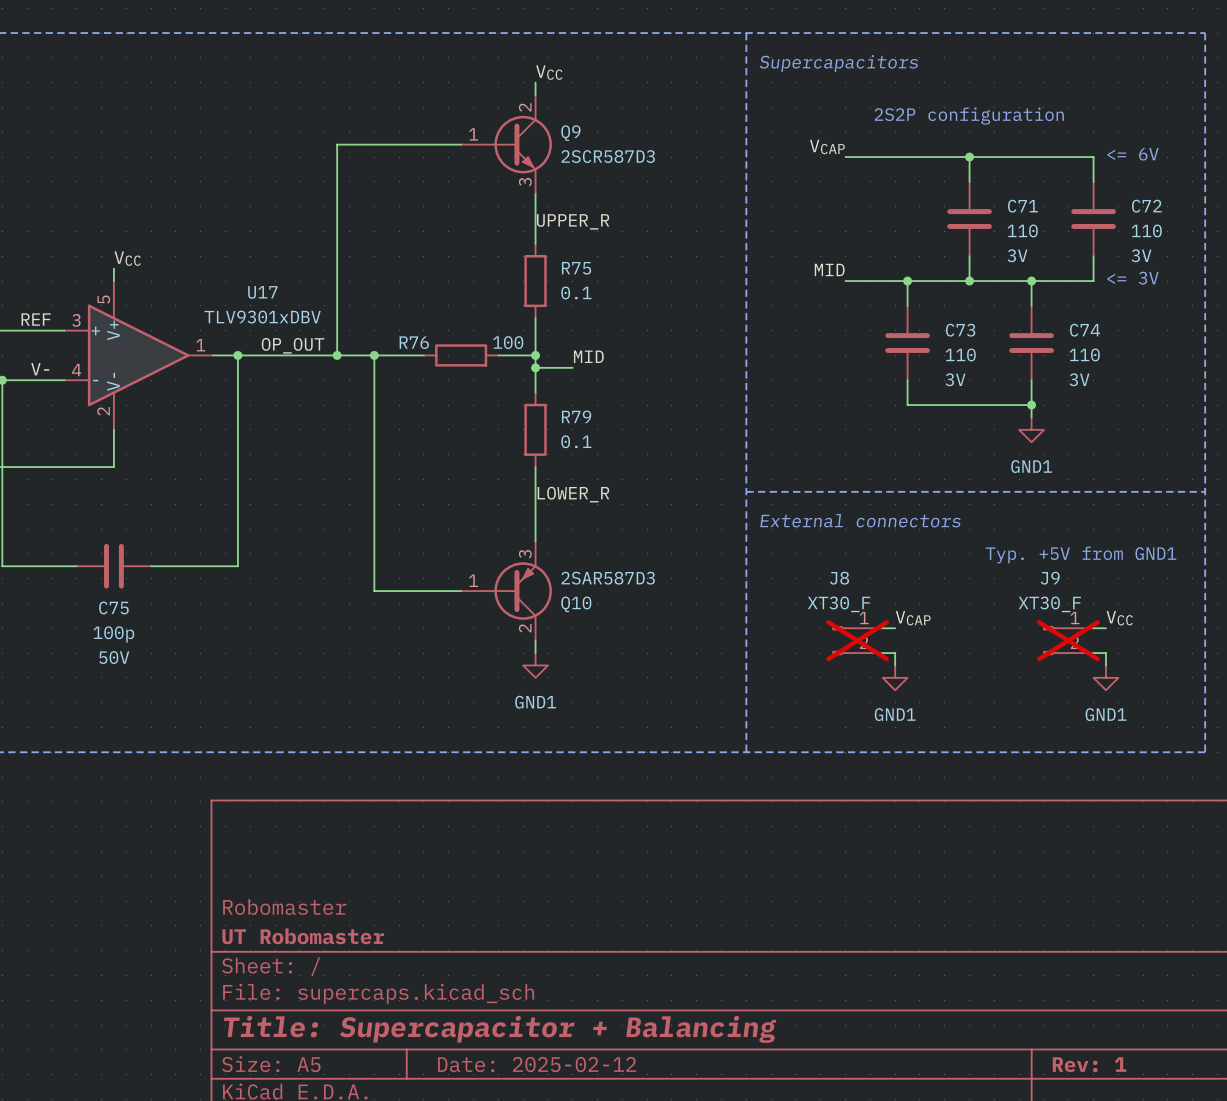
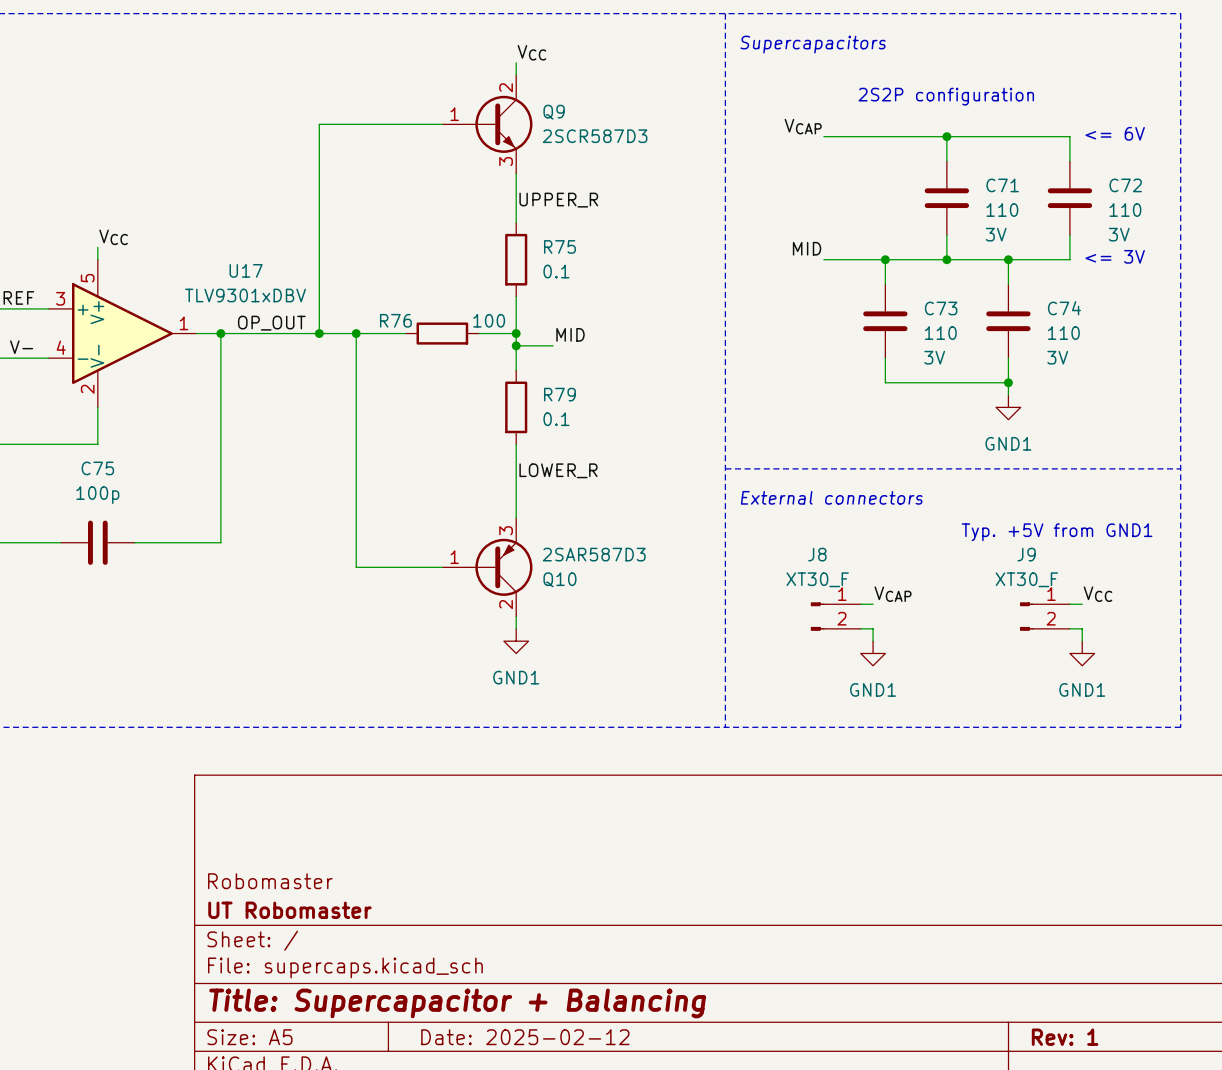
C75 name position: C75 (113, 607) -> C75 (97, 468)
C75 value position: 100p (113, 634) -> 100p (97, 495)
J8 do-not-place cross: (857, 640) -> none
J9 do-not-place cross: (1068, 640) -> none
C75 text: 50V (114, 657) -> none

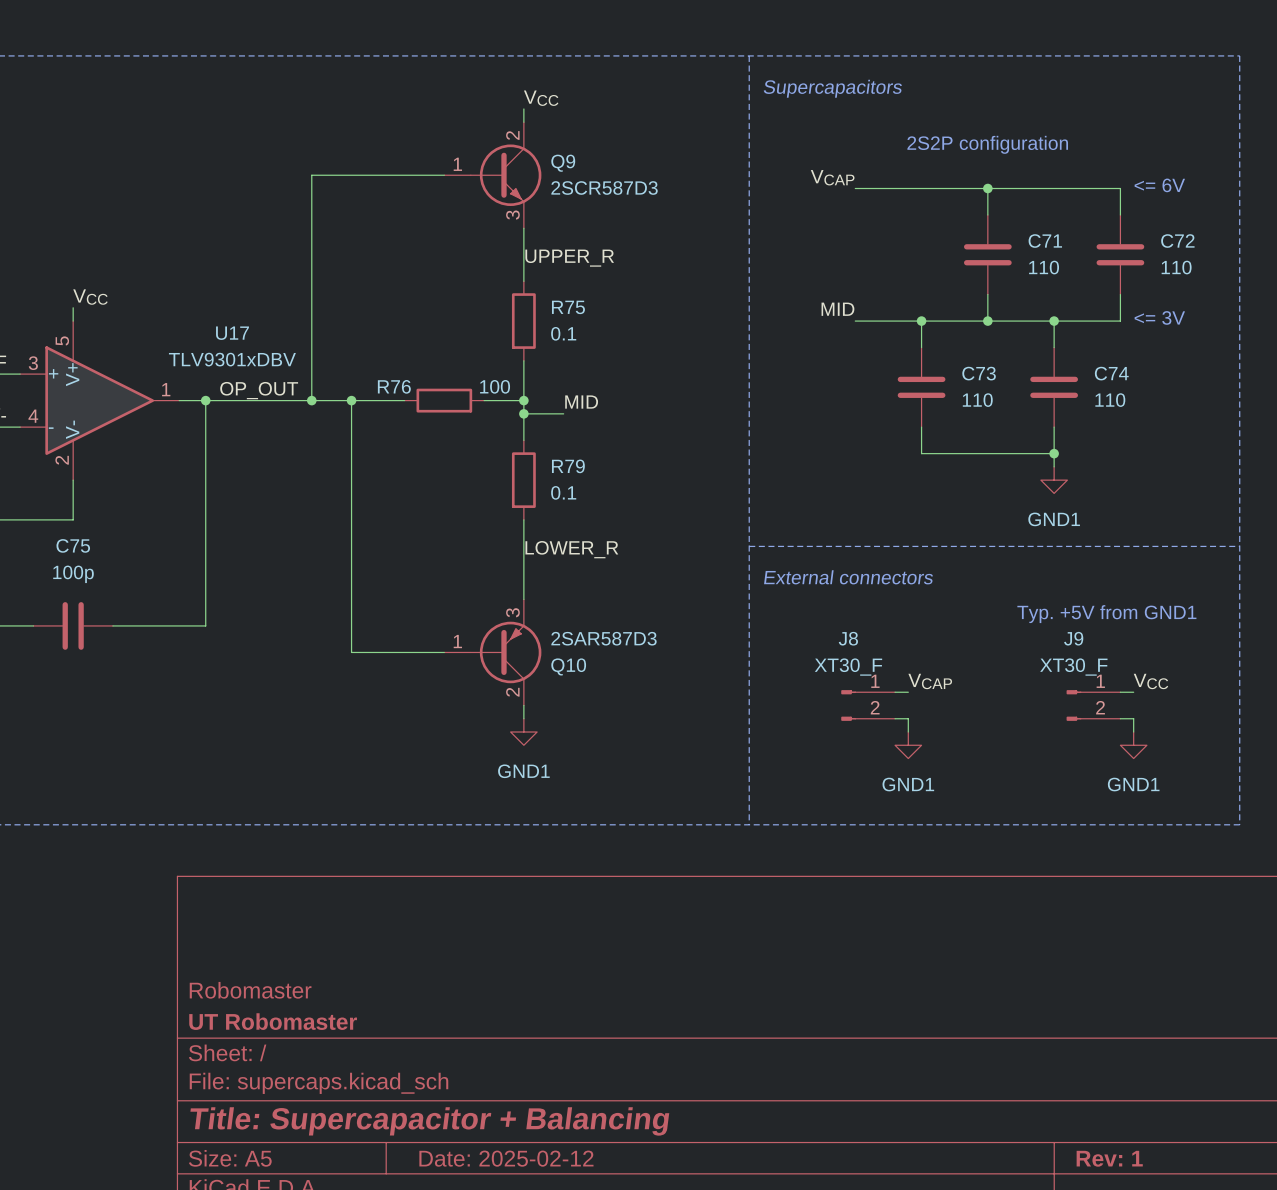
C71 text: 3V (996, 234) -> none
C72 text: 3V (1119, 234) -> none
C73 text: 3V (934, 357) -> none
C74 text: 3V (1057, 357) -> none

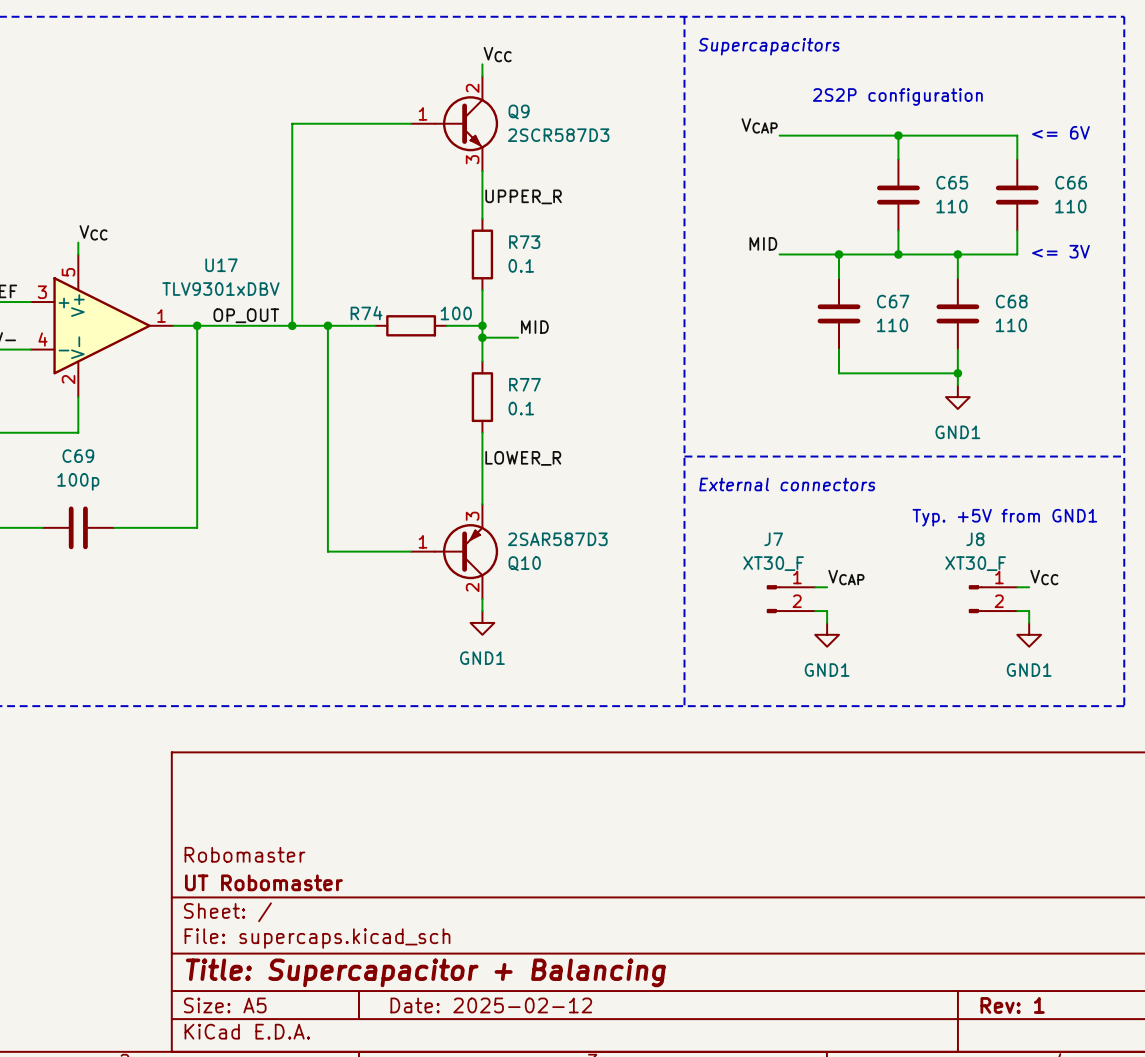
C71 name: C71 (1045, 241) -> C65 (952, 182)
C72 name: C72 (1177, 241) -> C66 (1071, 182)
R75 name: R75 (568, 307) -> R73 (524, 242)
C73 name: C73 (979, 373) -> C67 (893, 301)
C74 name: C74 (1111, 373) -> C68 (1011, 301)
R76 name: R76 (394, 386) -> R74 (366, 313)
R79 name: R79 (568, 466) -> R77 (524, 384)
C75 name: C75 (73, 545) -> C69 (78, 456)
J8 name: J8 (848, 638) -> J7 (773, 539)
J9 name: J9 (1073, 638) -> J8 (975, 539)

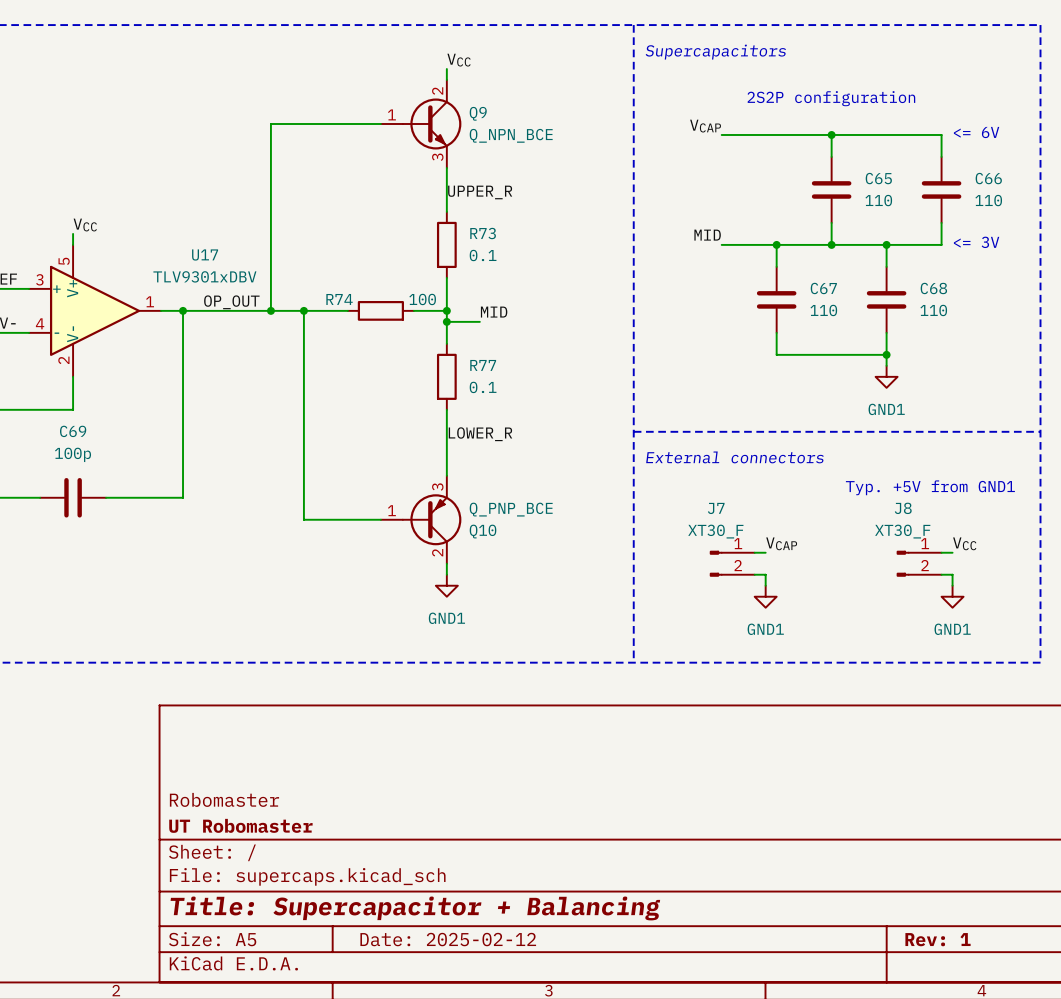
Q9 value: 2SCR587D3 (558, 135) -> Q_NPN_BCE (511, 135)
Q10 value: 2SAR587D3 (557, 539) -> Q_PNP_BCE (511, 509)

